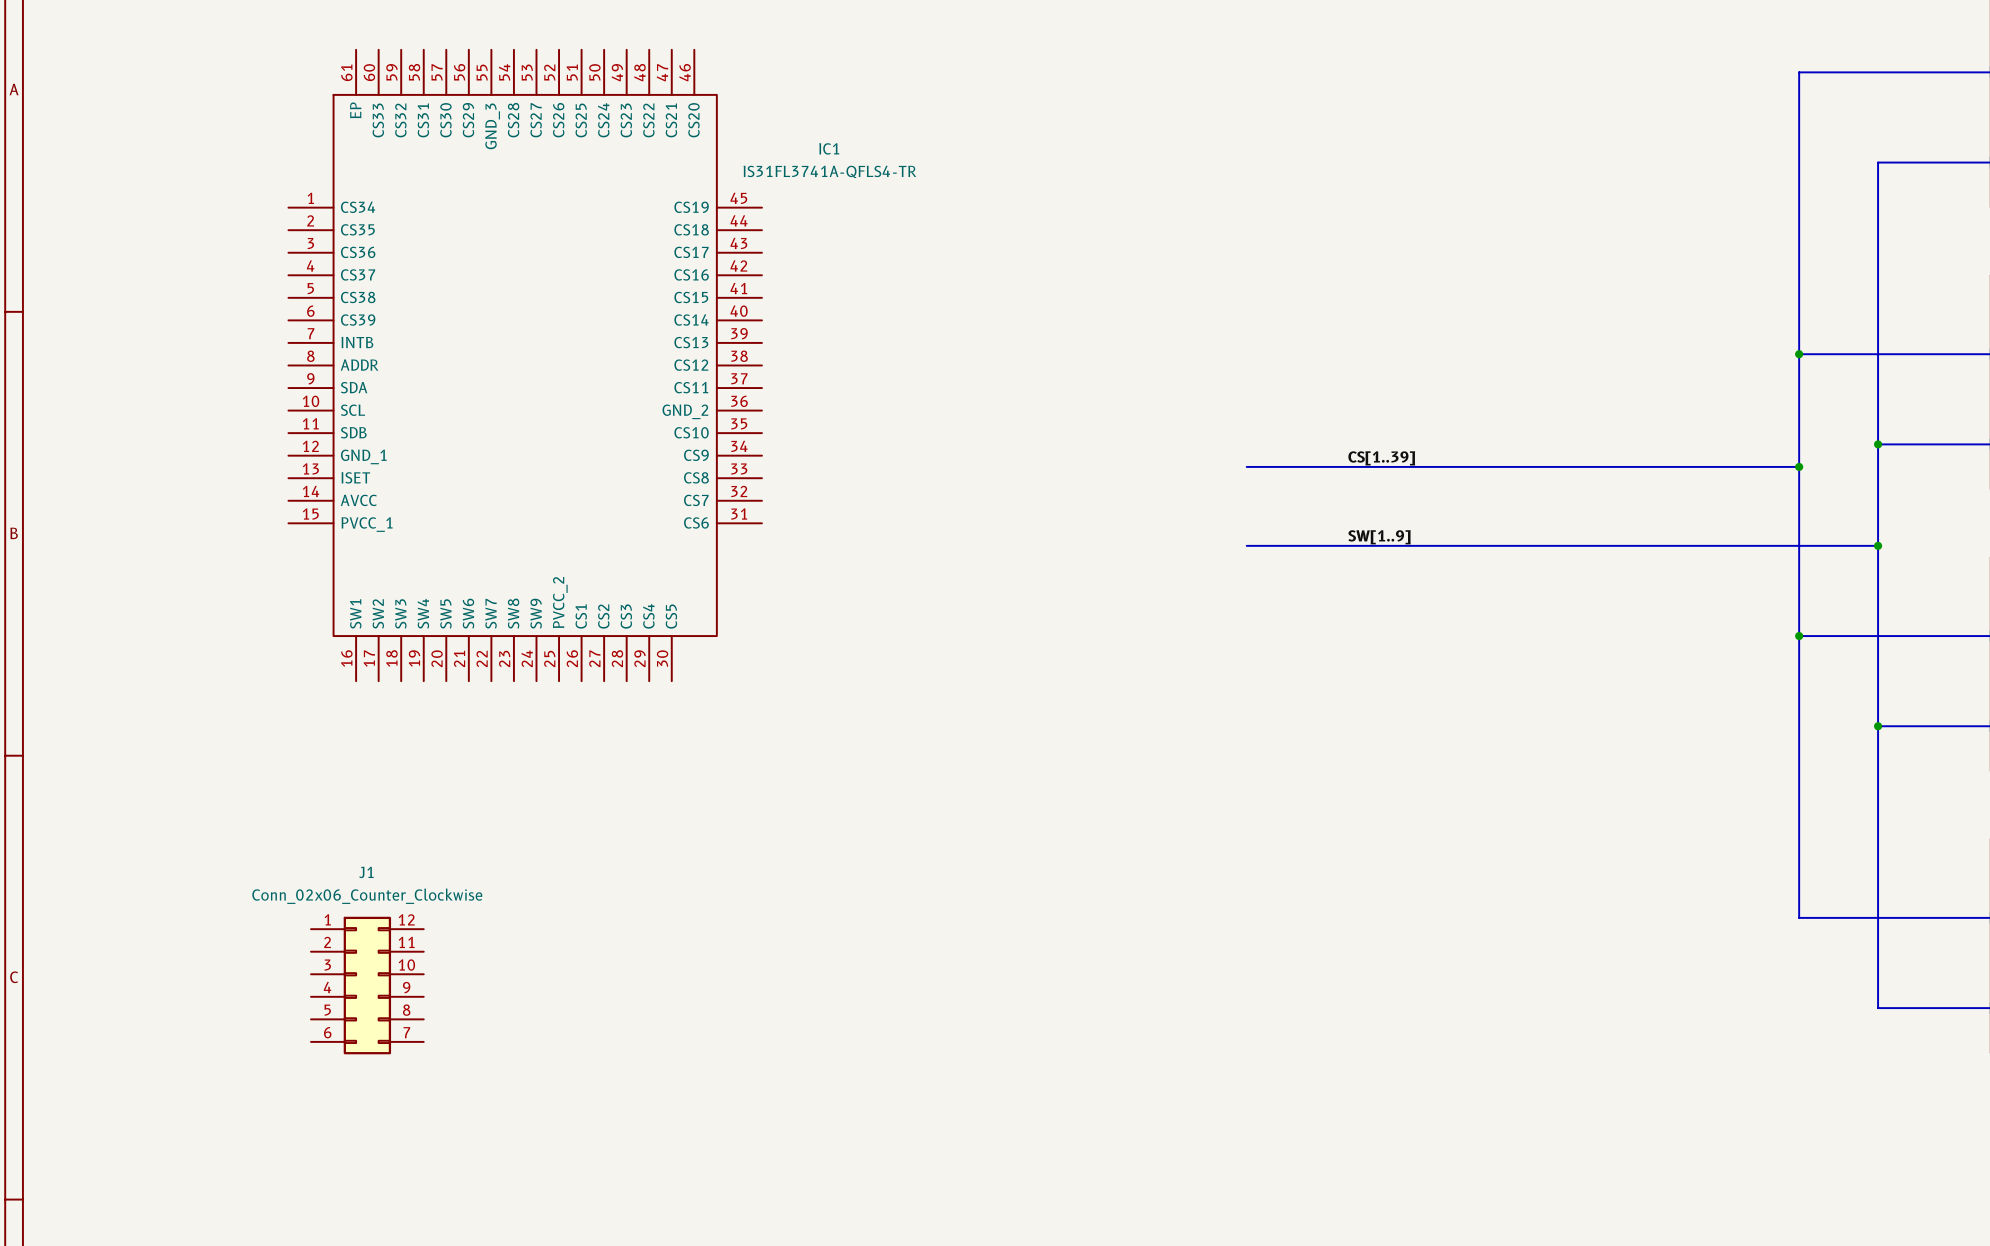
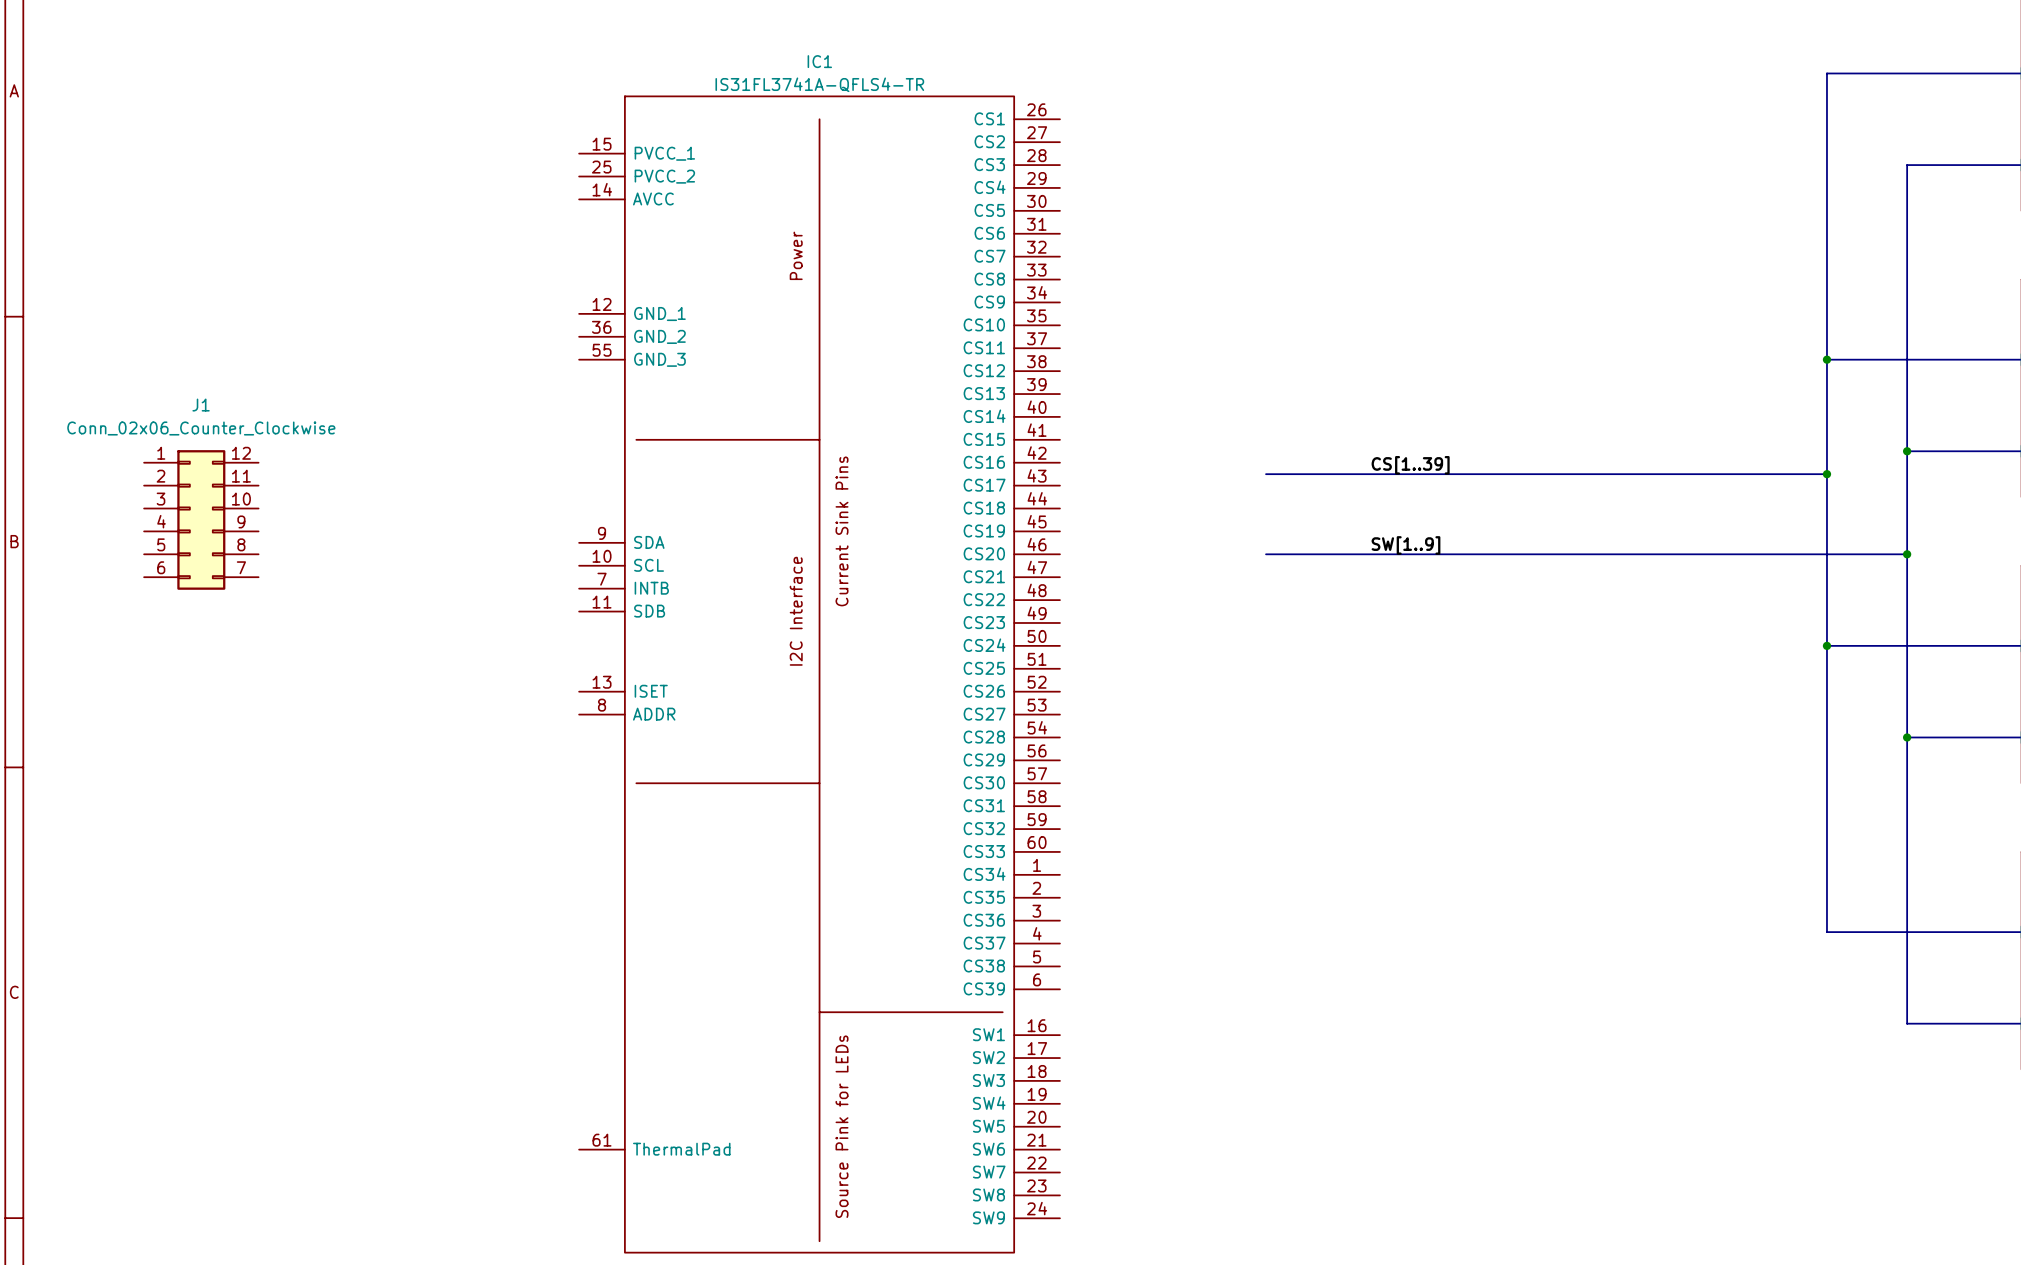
IC1 symbol: [288, 49, 762, 682] -> [579, 95, 1060, 1254]
IC1 name position: IC1 (829, 148) -> IC1 (819, 61)
IC1 value position: IS31FL3741A-QFLS4-TR (829, 171) -> IS31FL3741A-QFLS4-TR (819, 84)
J1 position: (367, 985) -> (201, 519)

